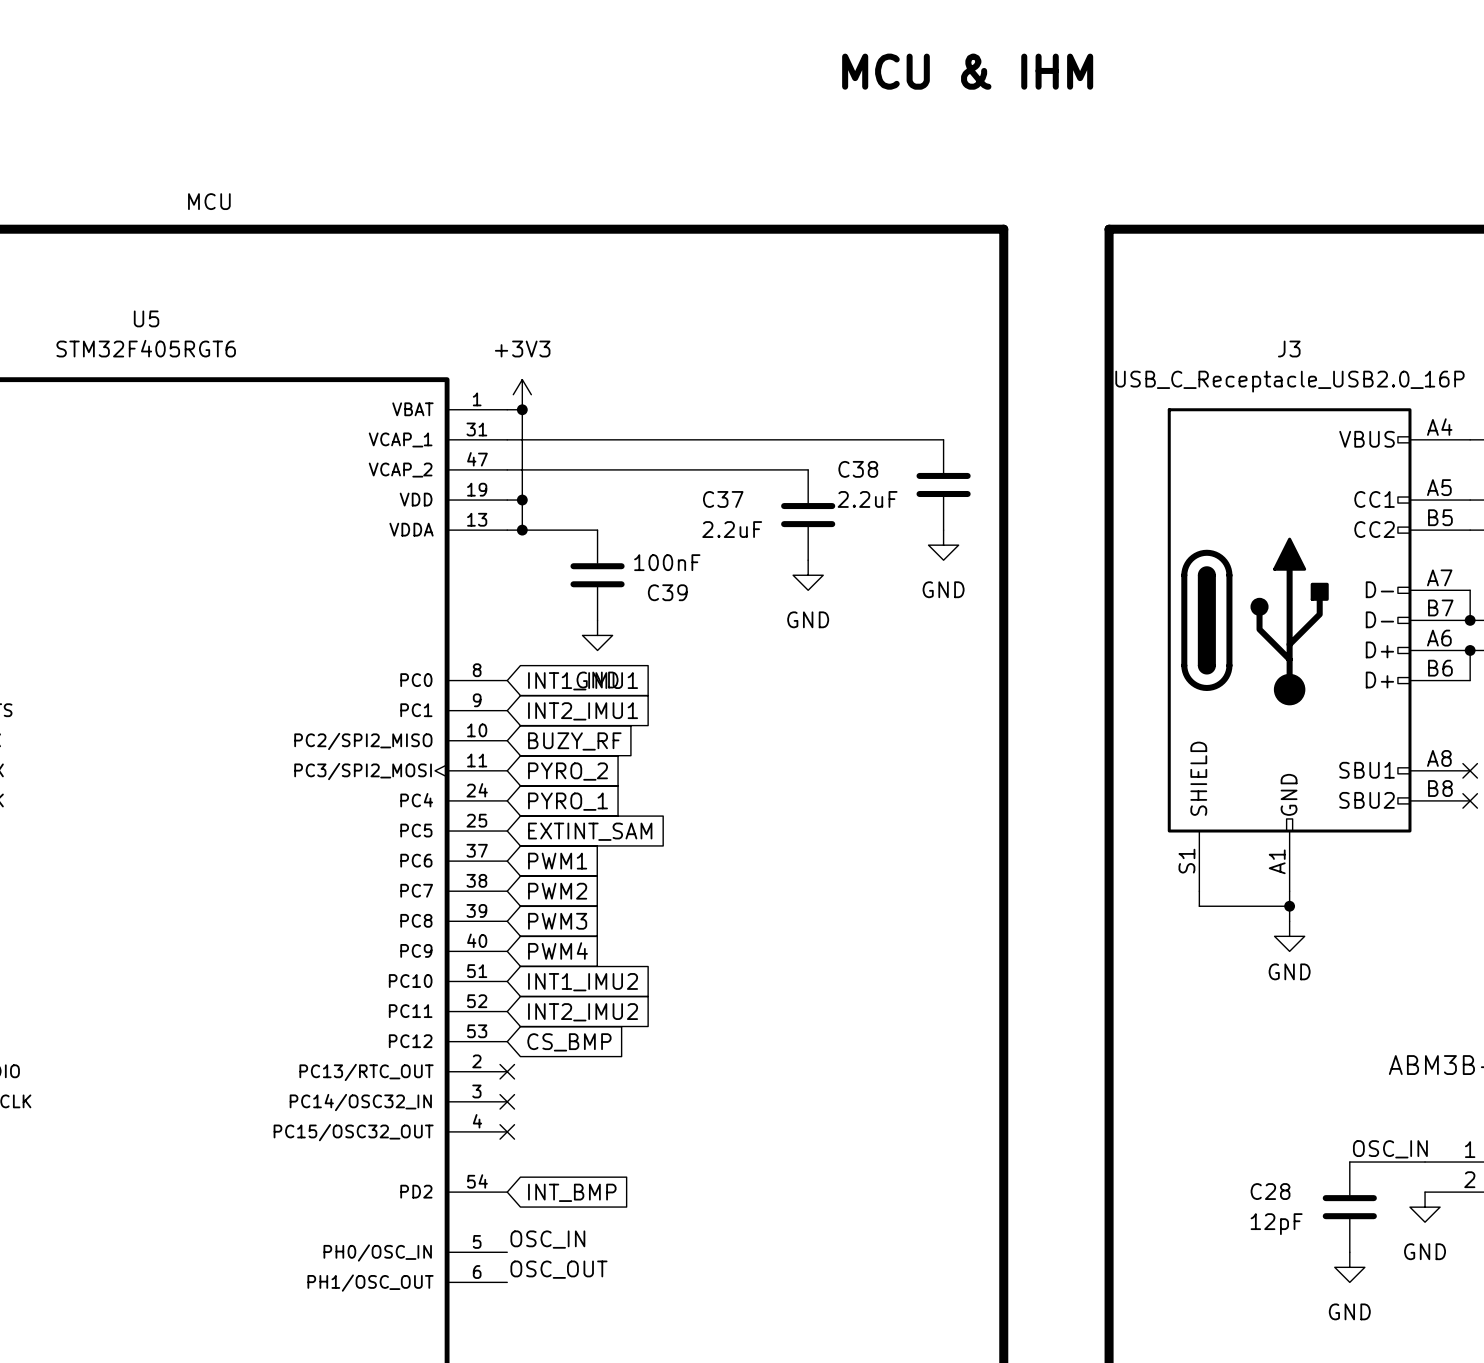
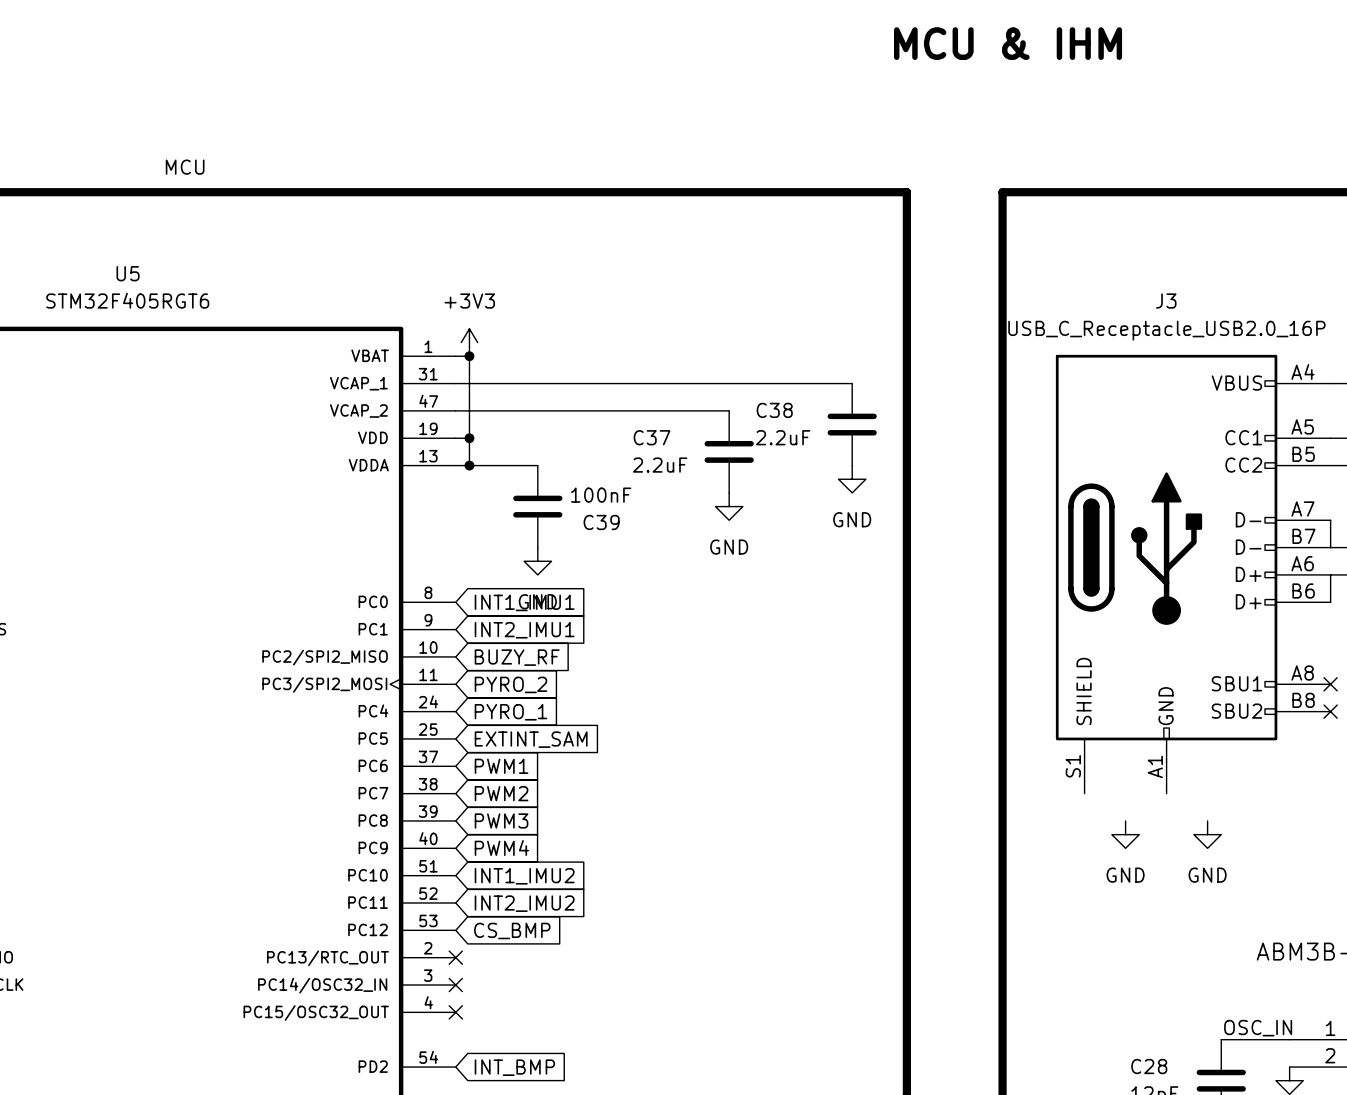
text position: MCU & IHM (967, 71) -> MCU & IHM (1008, 43)
junction: (1470, 620) -> none
junction: (1470, 650) -> none
wire: (1199, 891) (1199, 906) (1289, 906) -> none
wire: (1289, 891) (1289, 921) -> none
junction: (1289, 906) -> none
power symbol: none -> GND (1125, 834)
power symbol: GND (1289, 936) -> none
power symbol: none -> GND (1207, 834)

